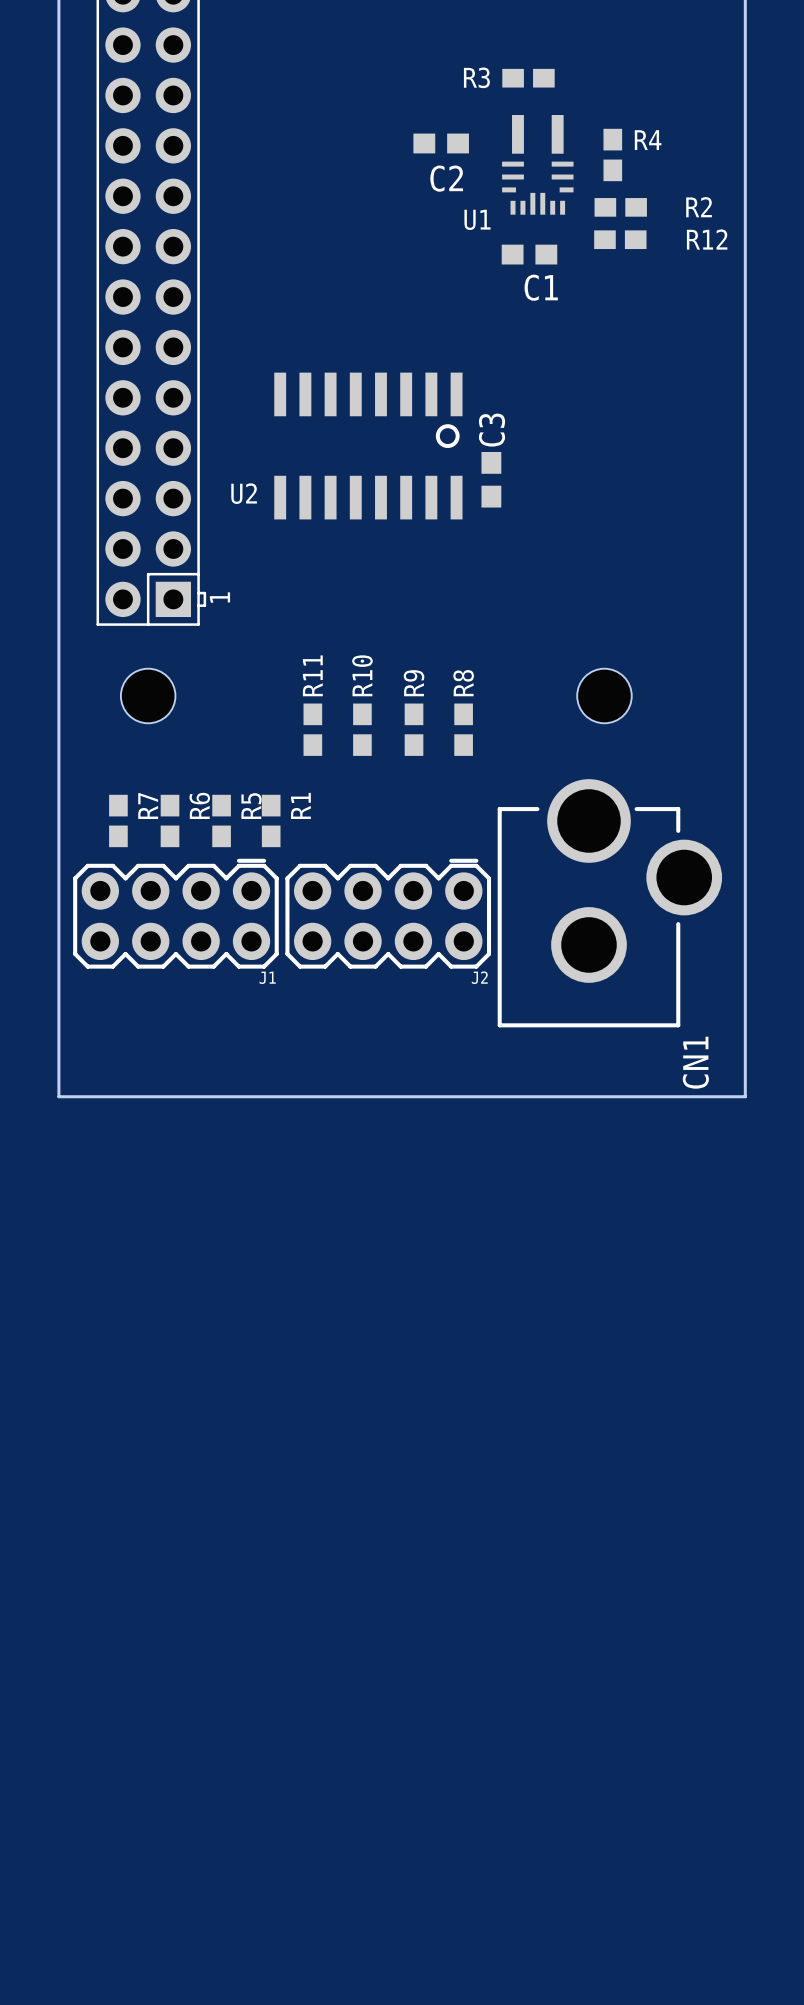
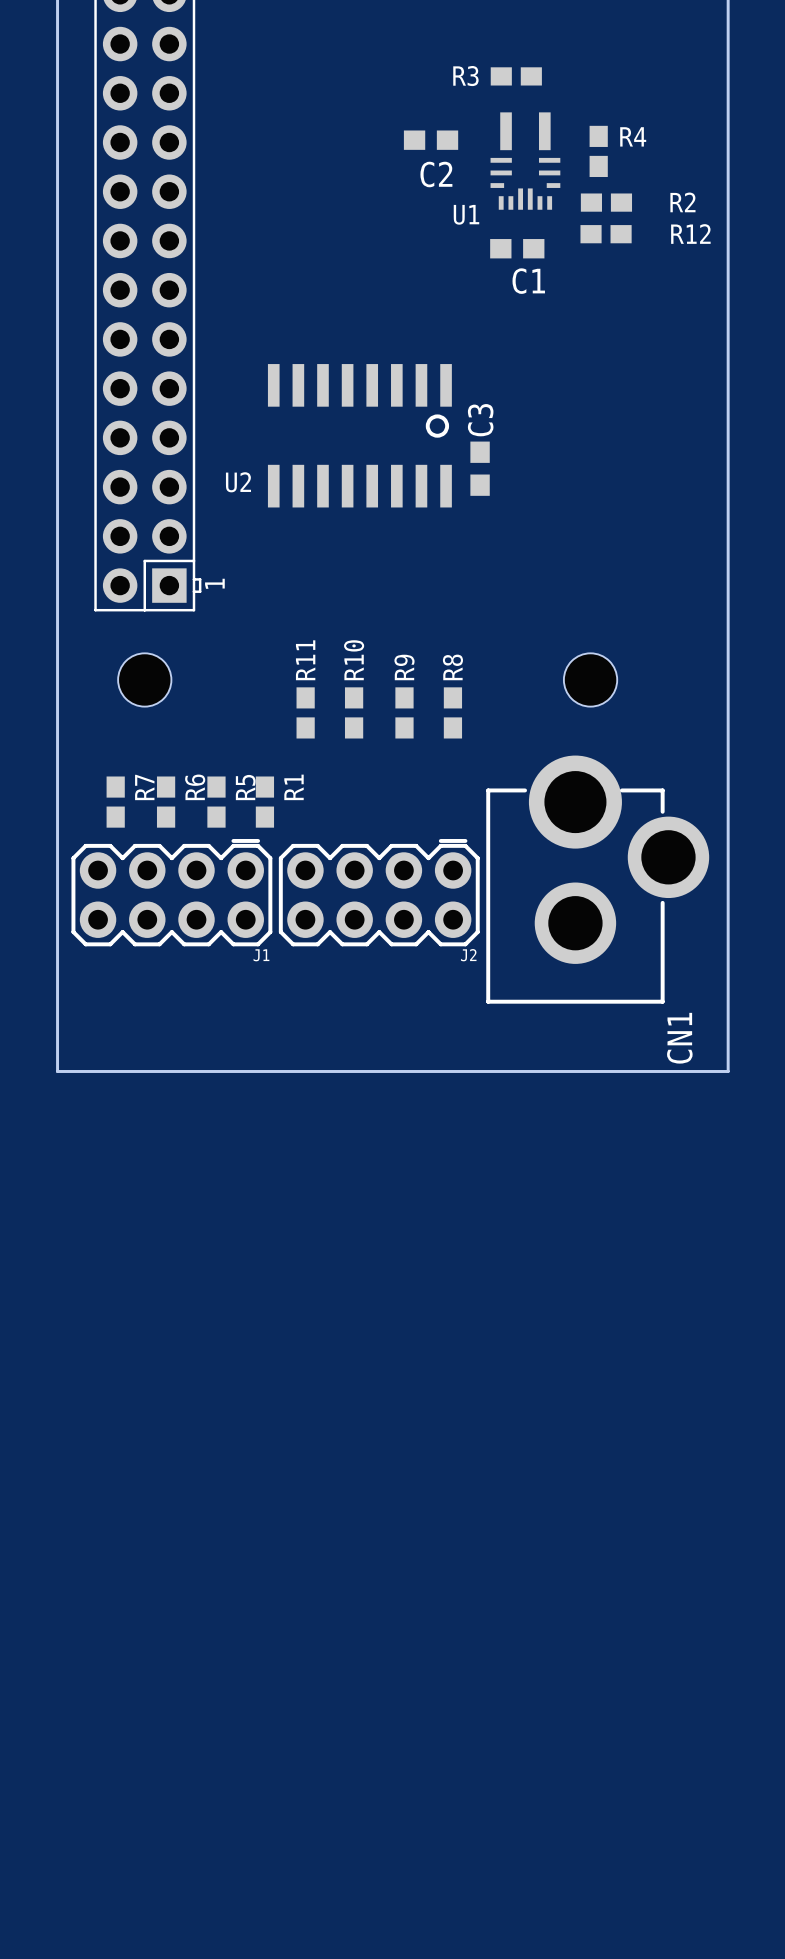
CN1 footprint: [497, 779, 723, 1028] -> [486, 755, 710, 1004]

